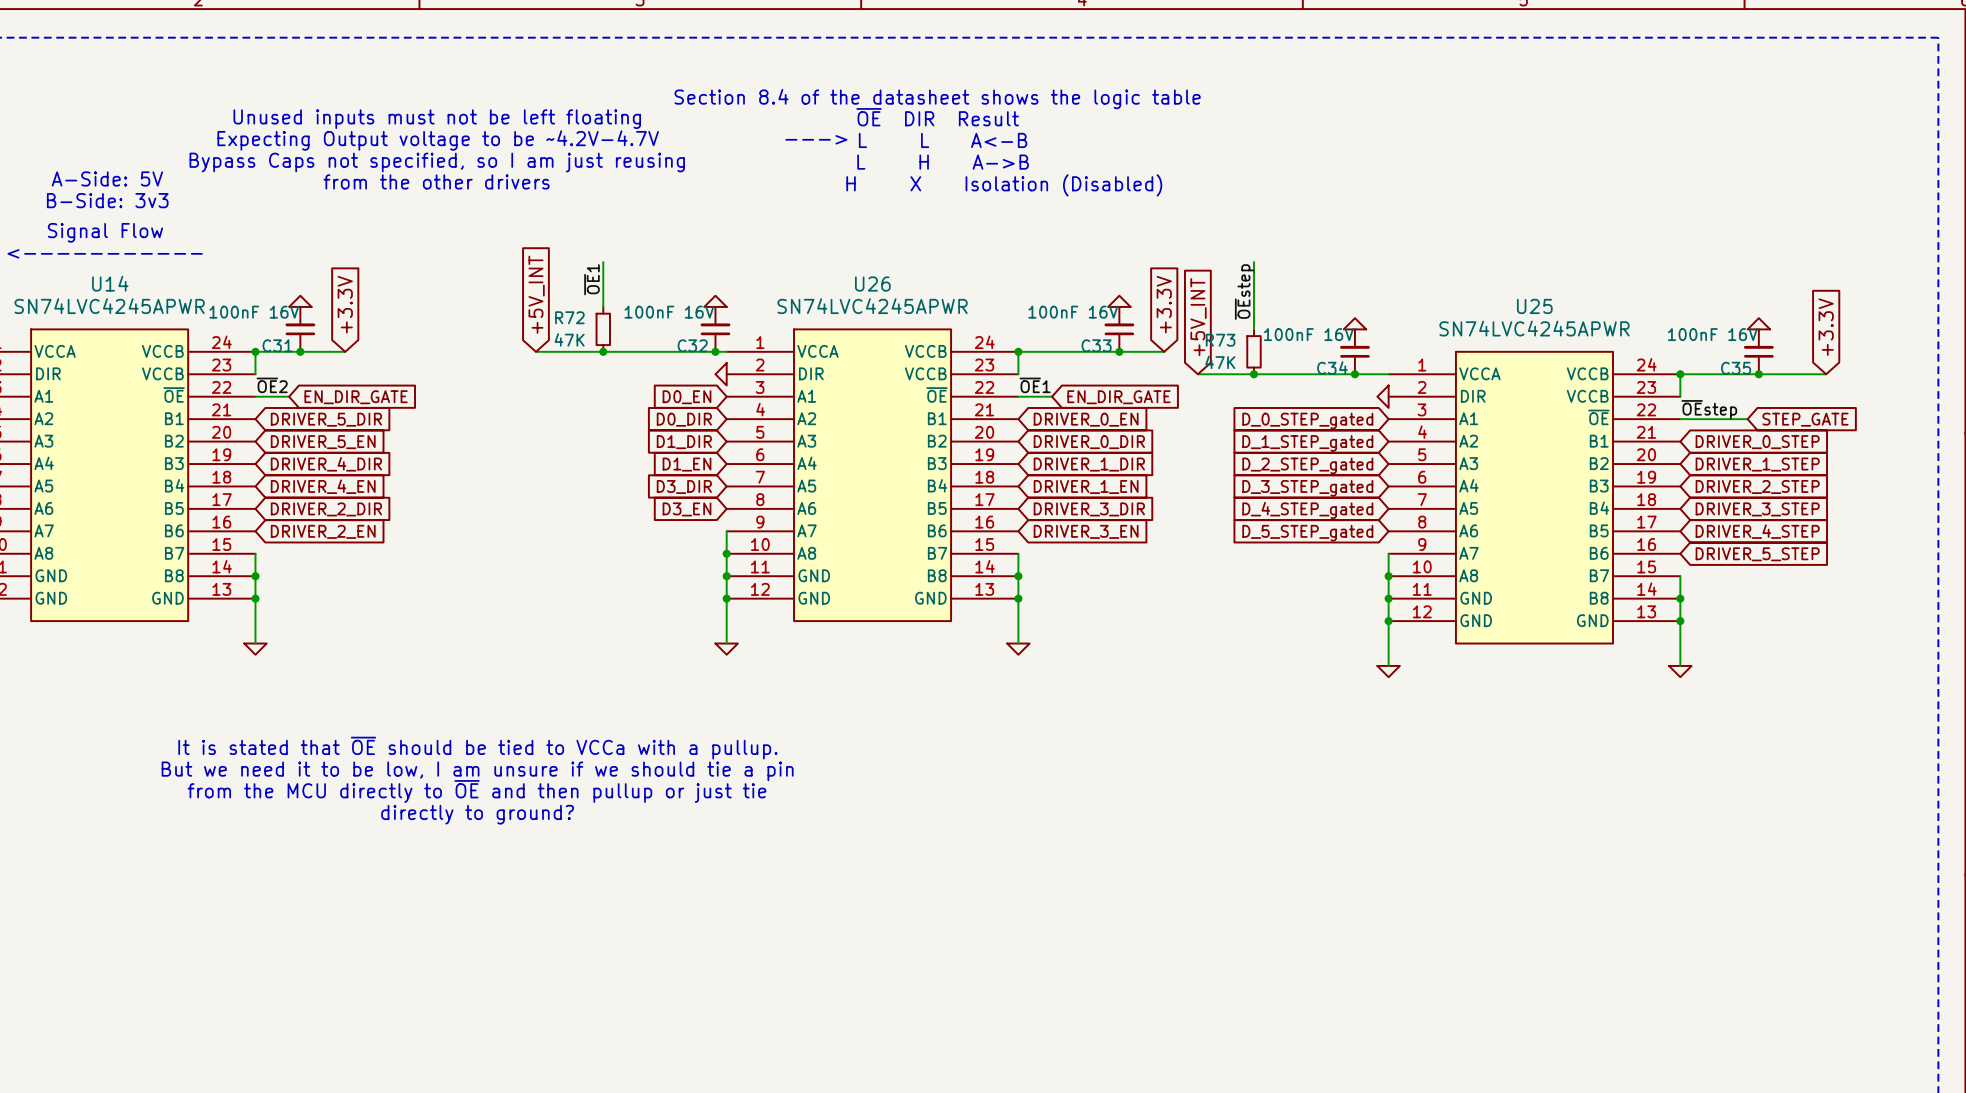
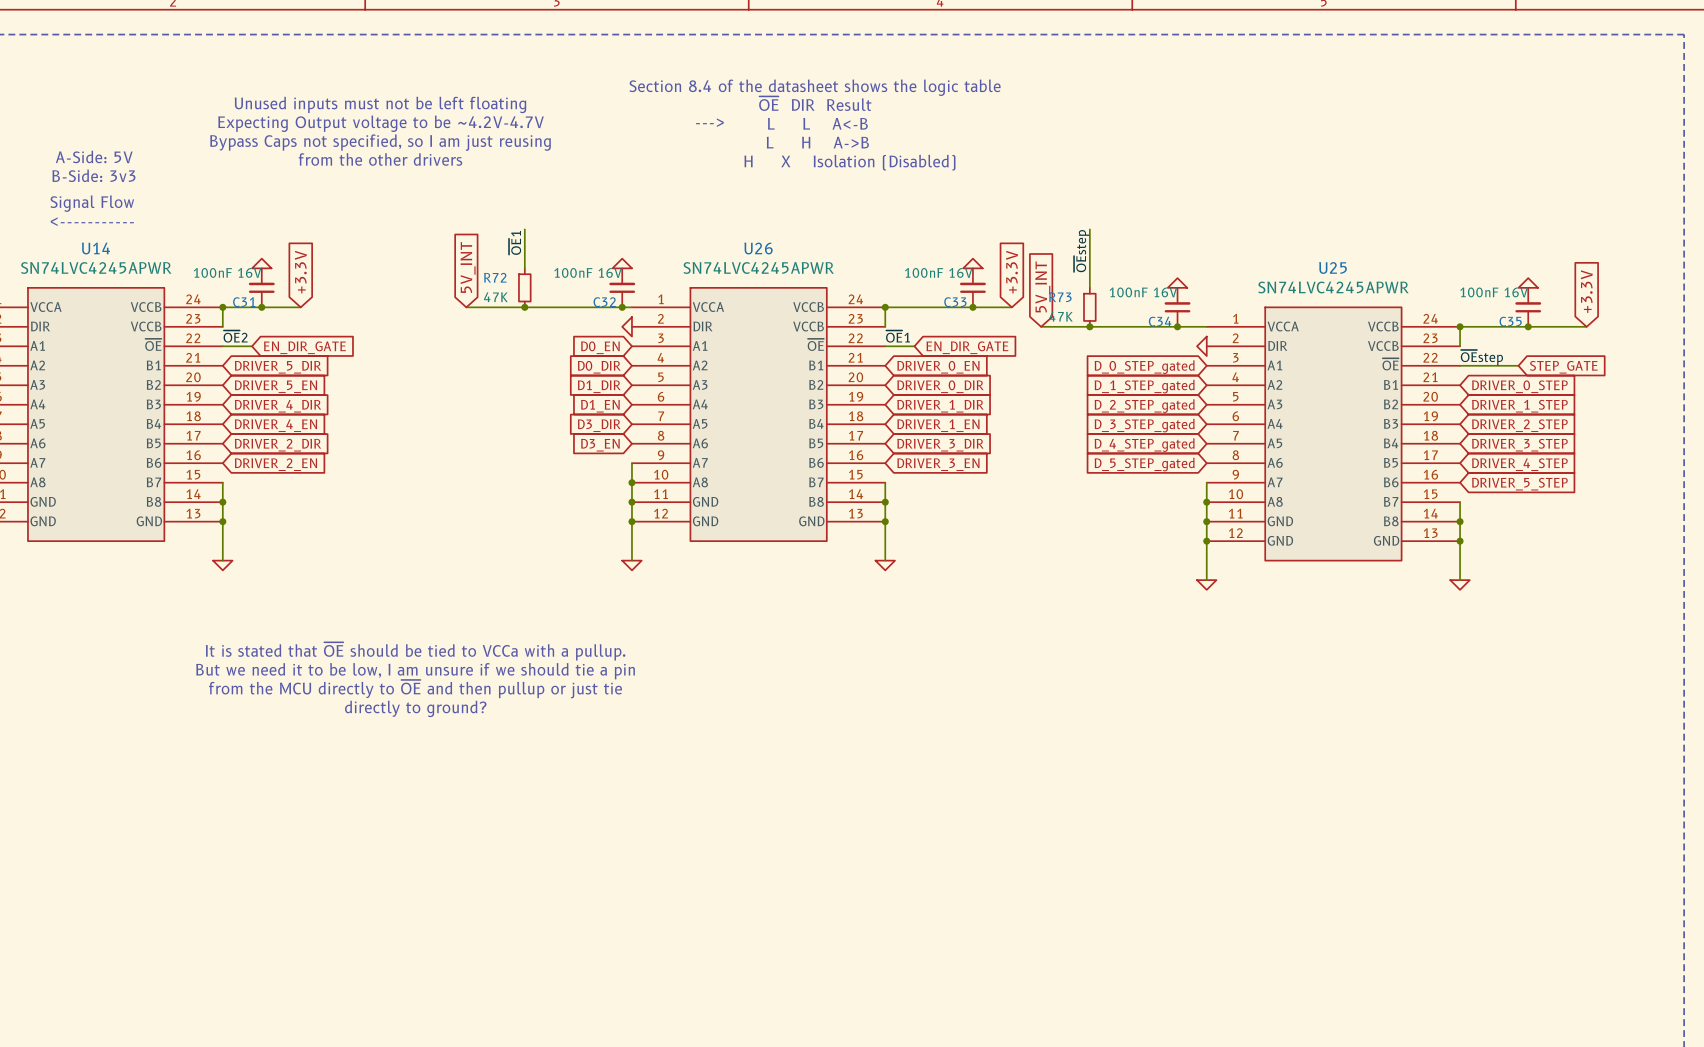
global label: +5V_INT (536, 294) -> 5V_INT (468, 267)
global label: +5V_INT (1198, 317) -> 5V_INT (1042, 286)

